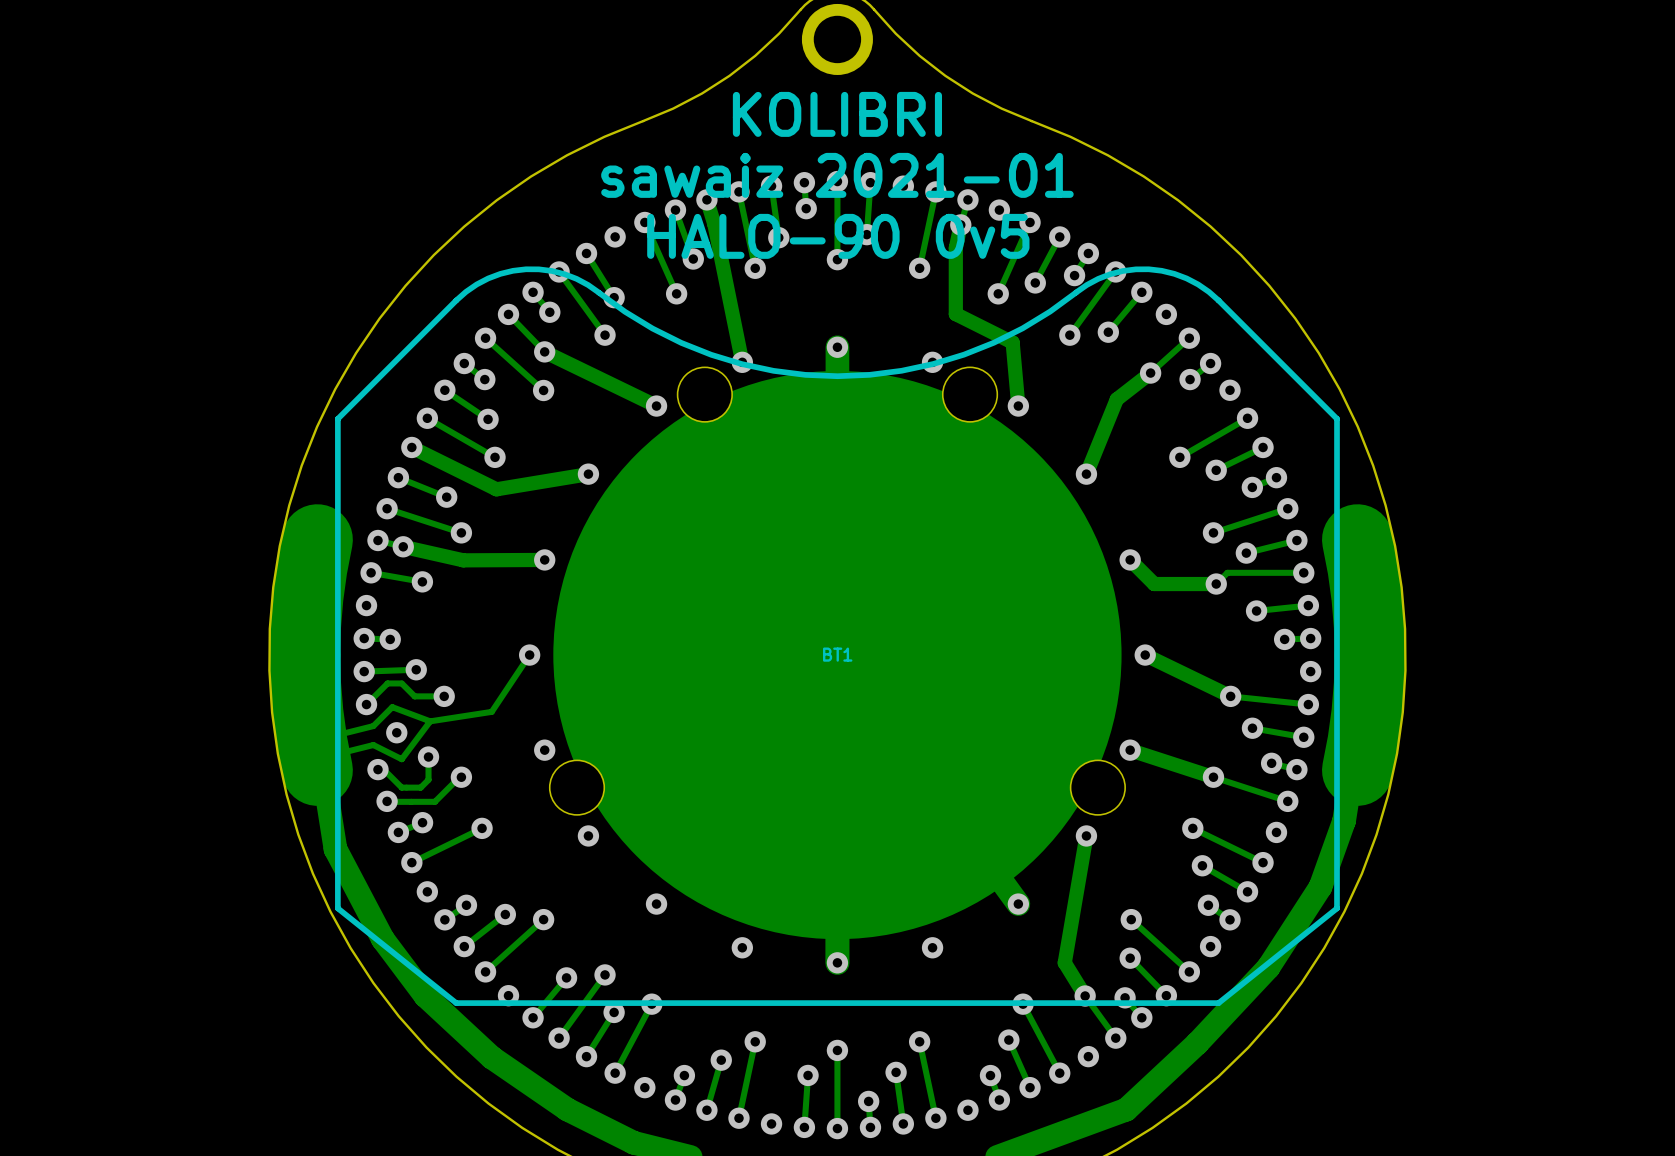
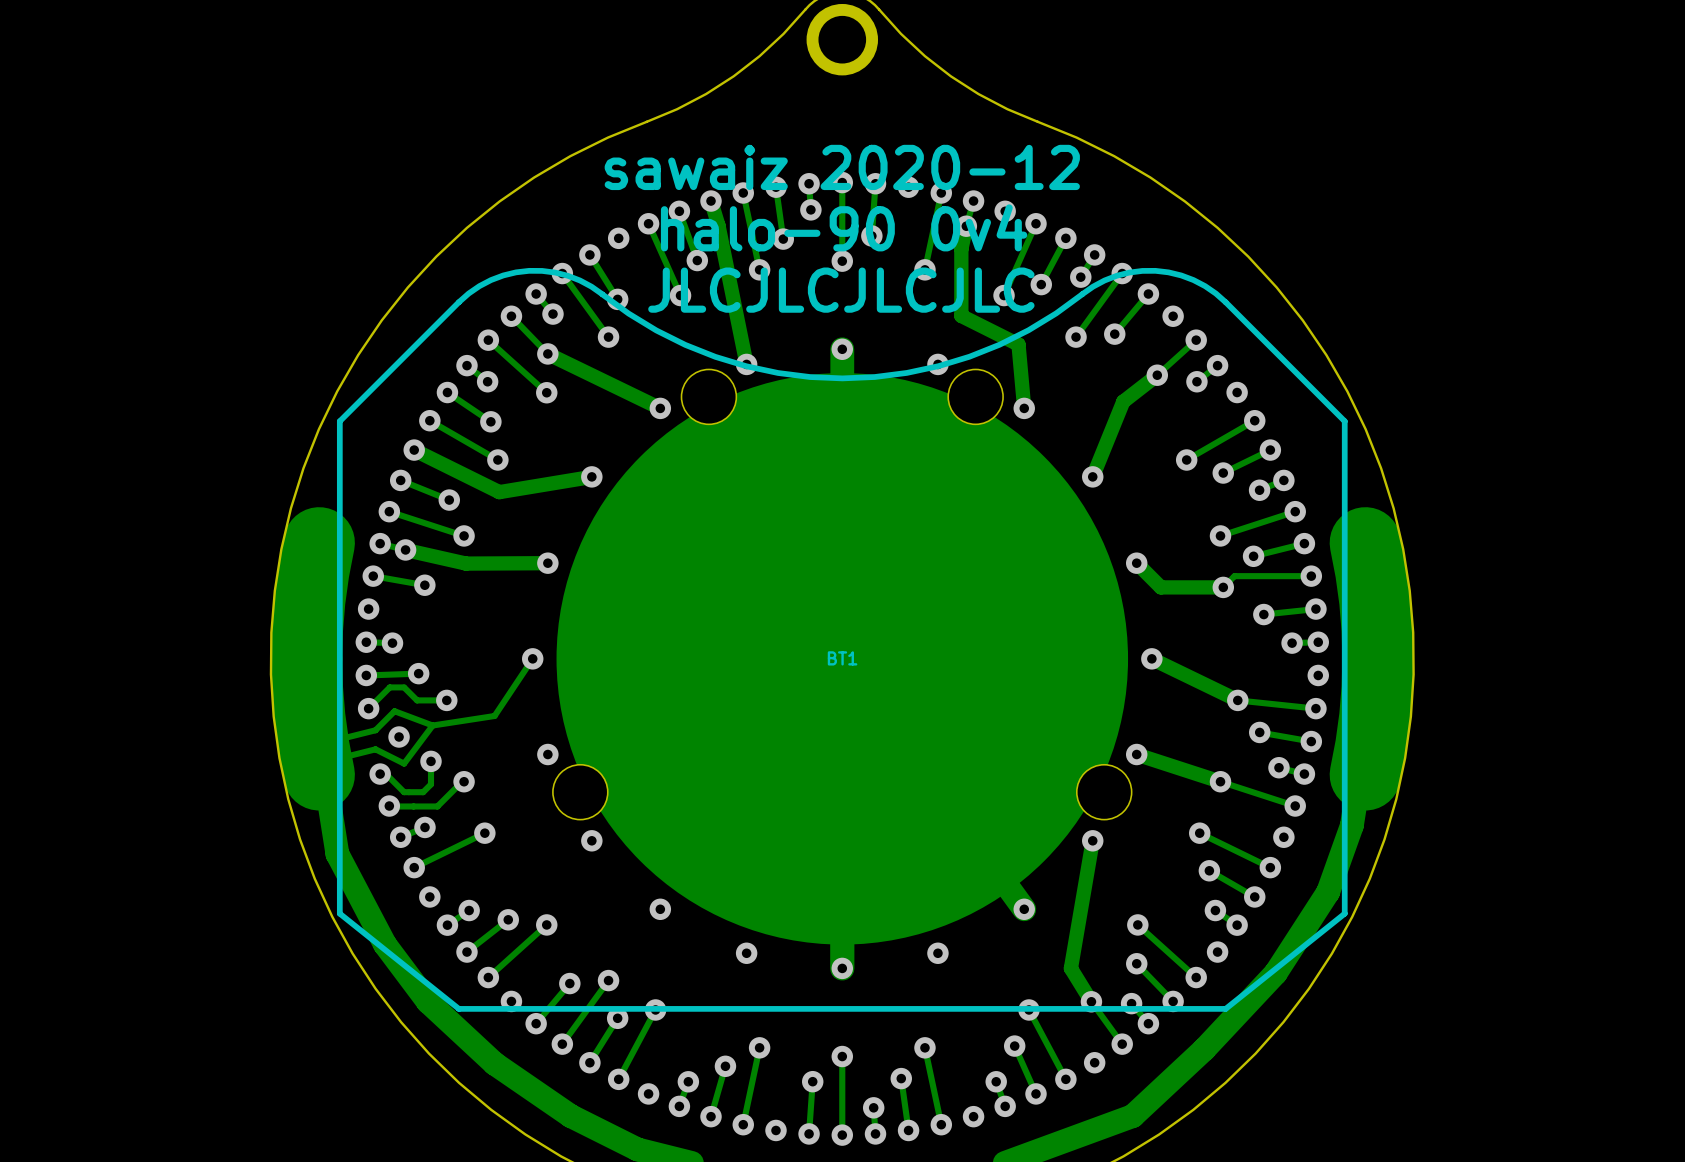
text: KOLIBRI (837, 114) -> none
text: sawaiz 2021-01 (837, 175) -> sawaiz 2020-12 (842, 167)
text: HALO-90 0v5 (838, 236) -> halo-90 0v4 (844, 227)
text: none -> JLCJLCJLCJLC (841, 290)

